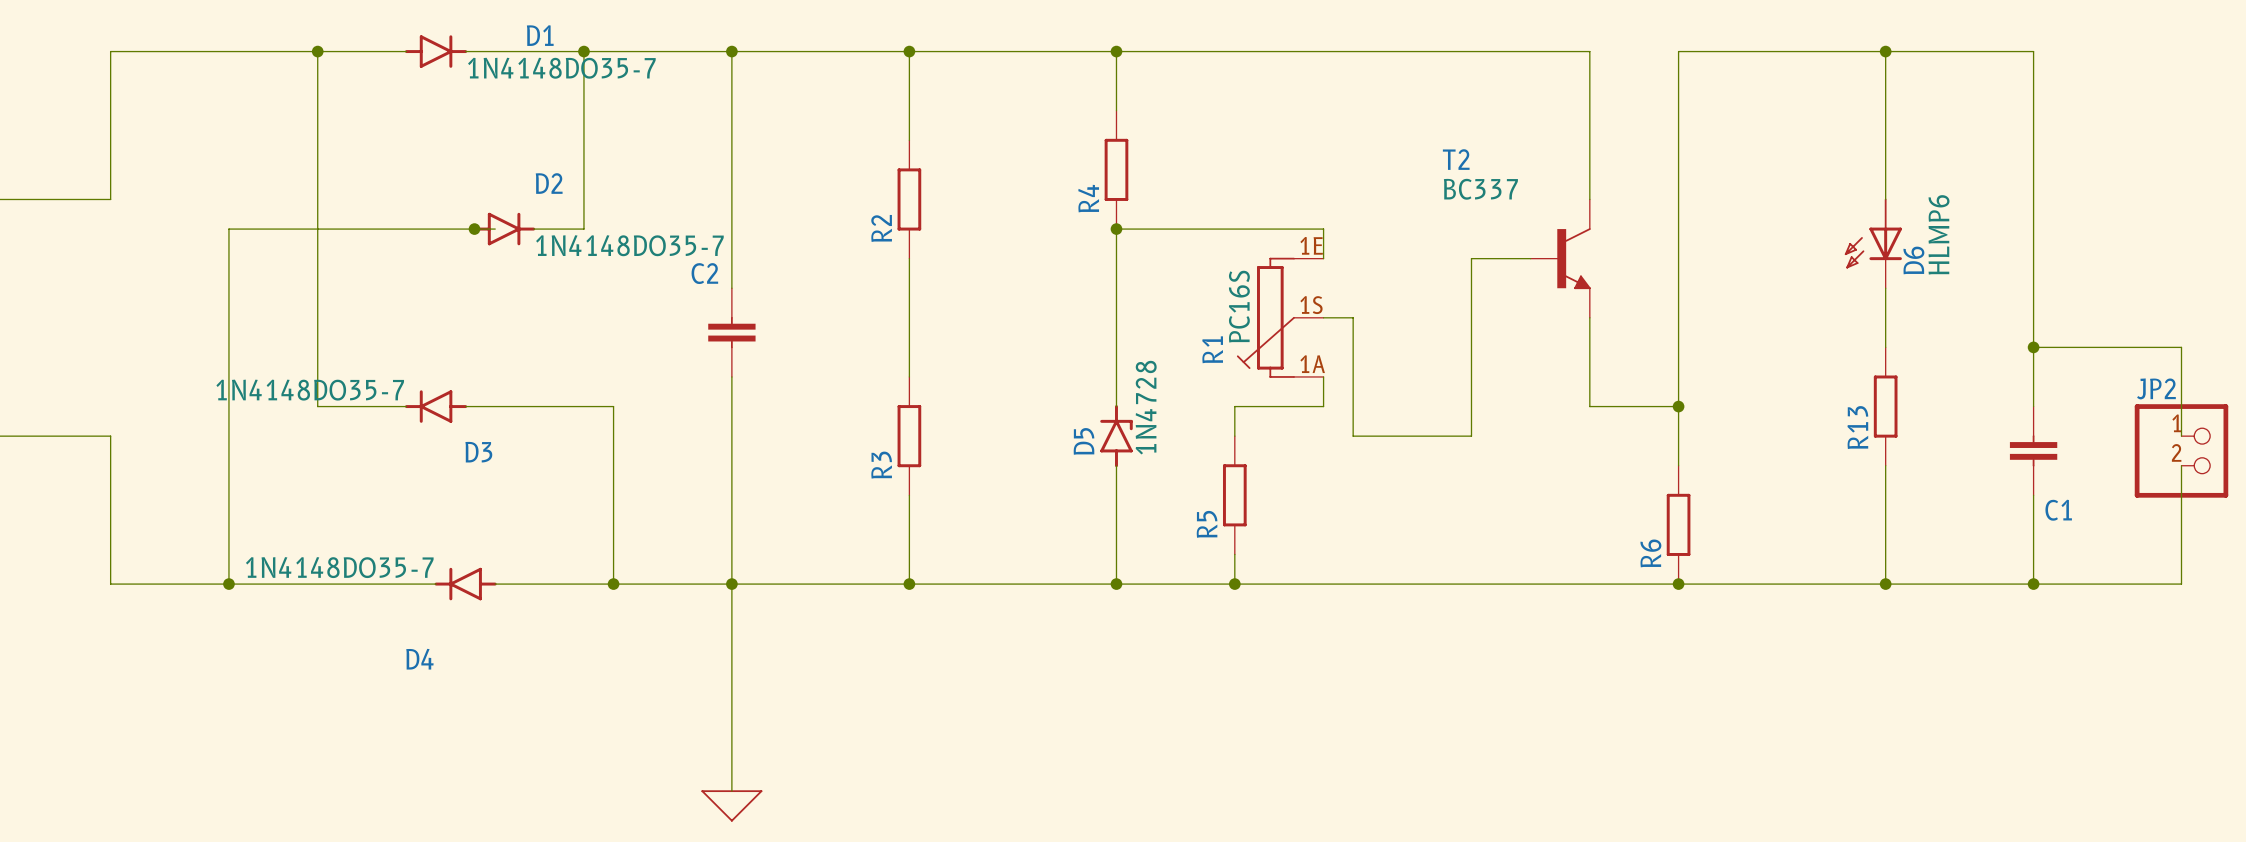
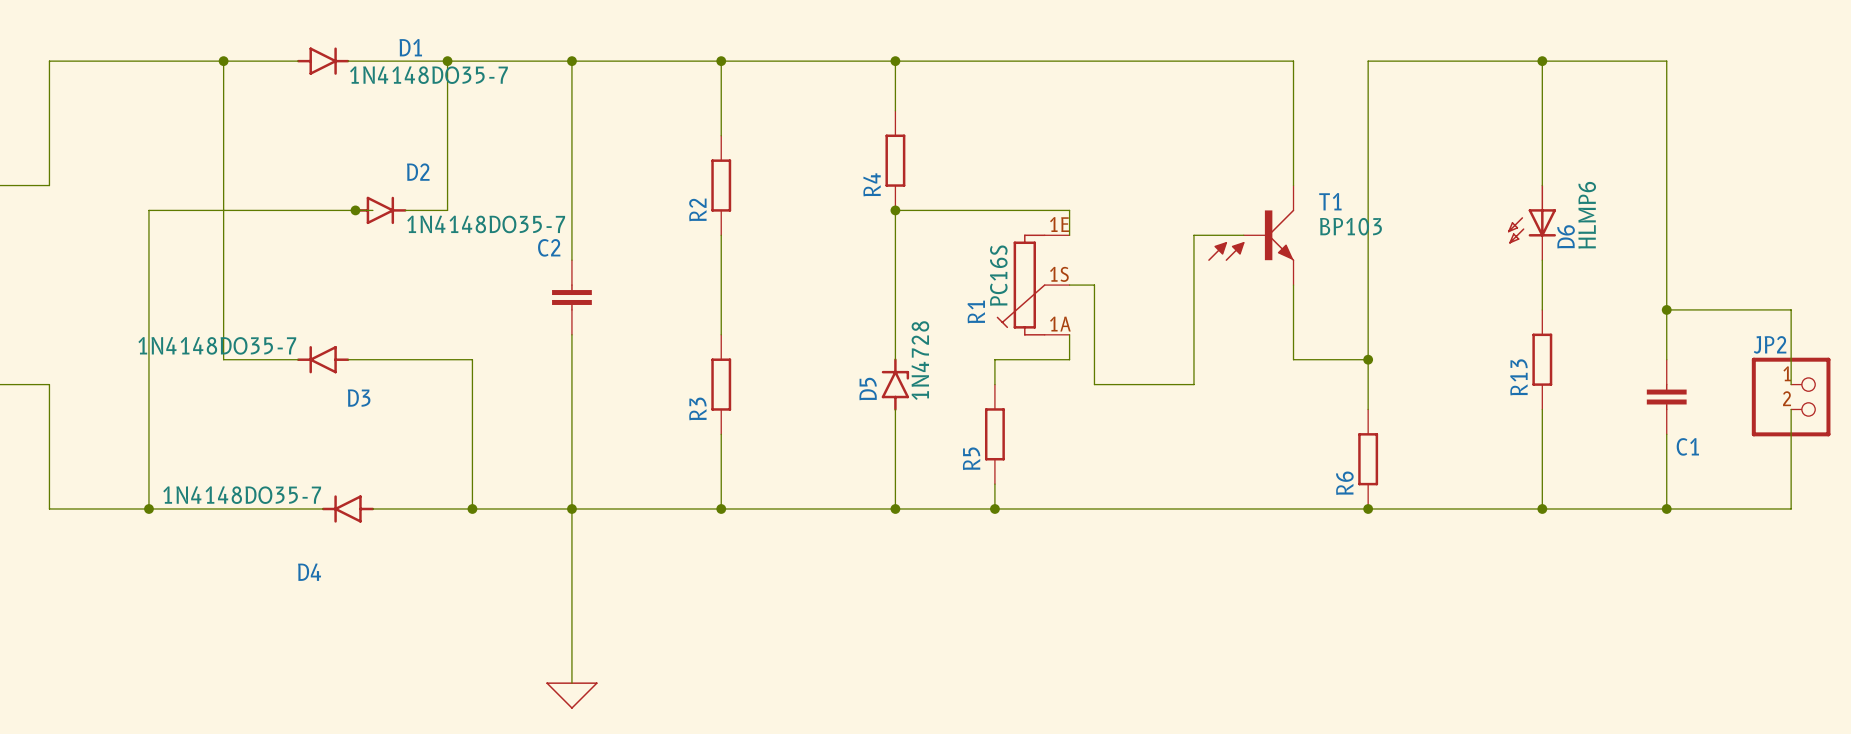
T1: none -> BP103 (1251, 235)
T2: BC337 (1560, 258) -> none

